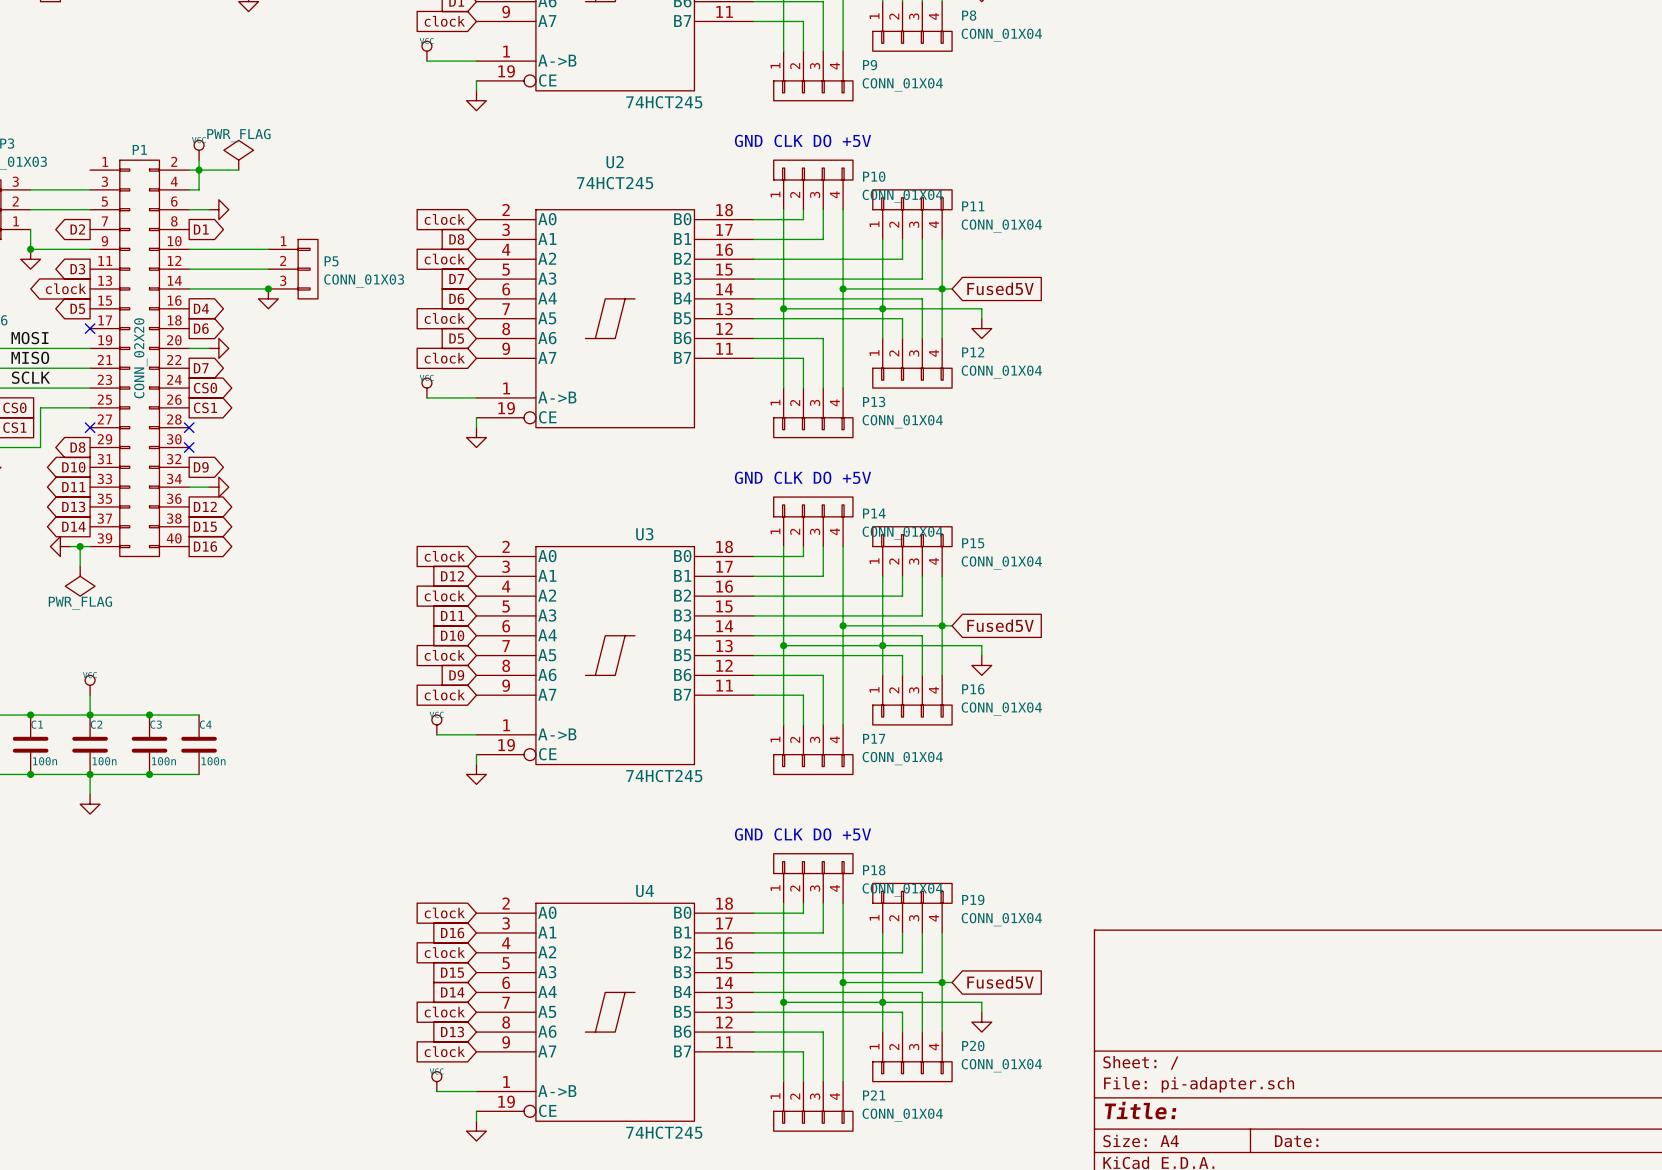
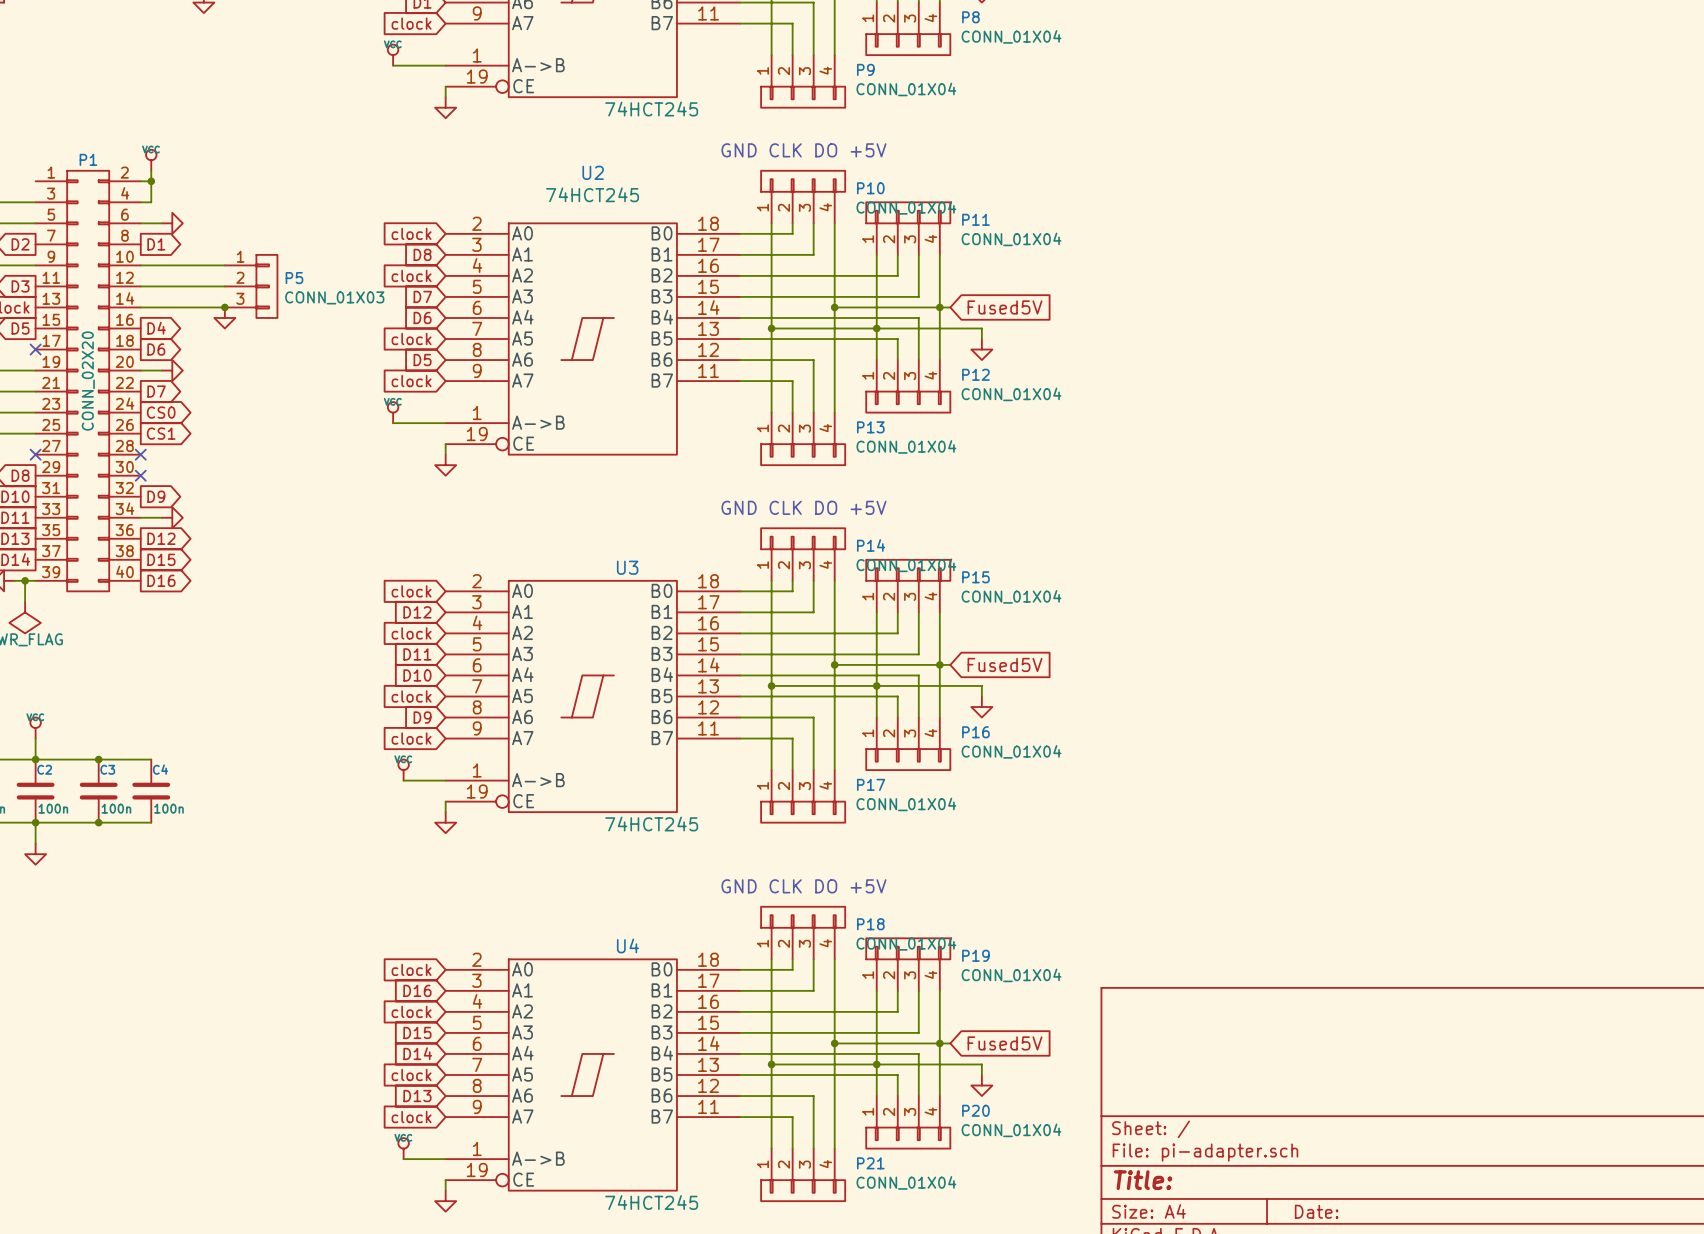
power symbol: PWR_FLAG (238, 155) -> none
wire: (199, 170) (238, 170) -> none

